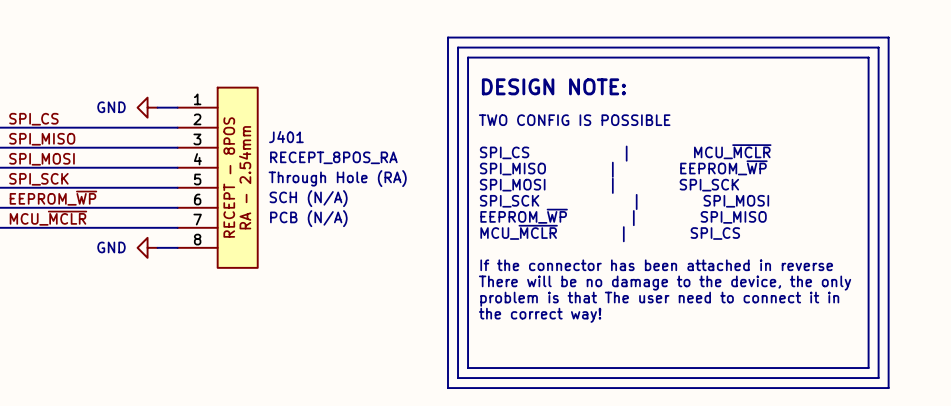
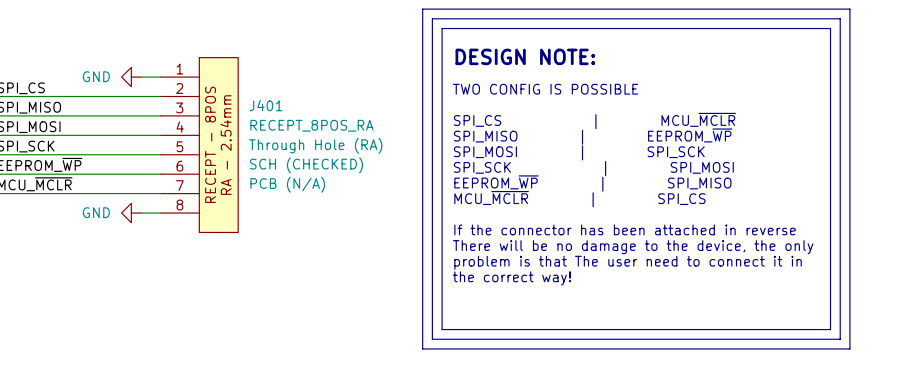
J401 text: SCH (N/A) (308, 198) -> SCH (CHECKED) (306, 165)

